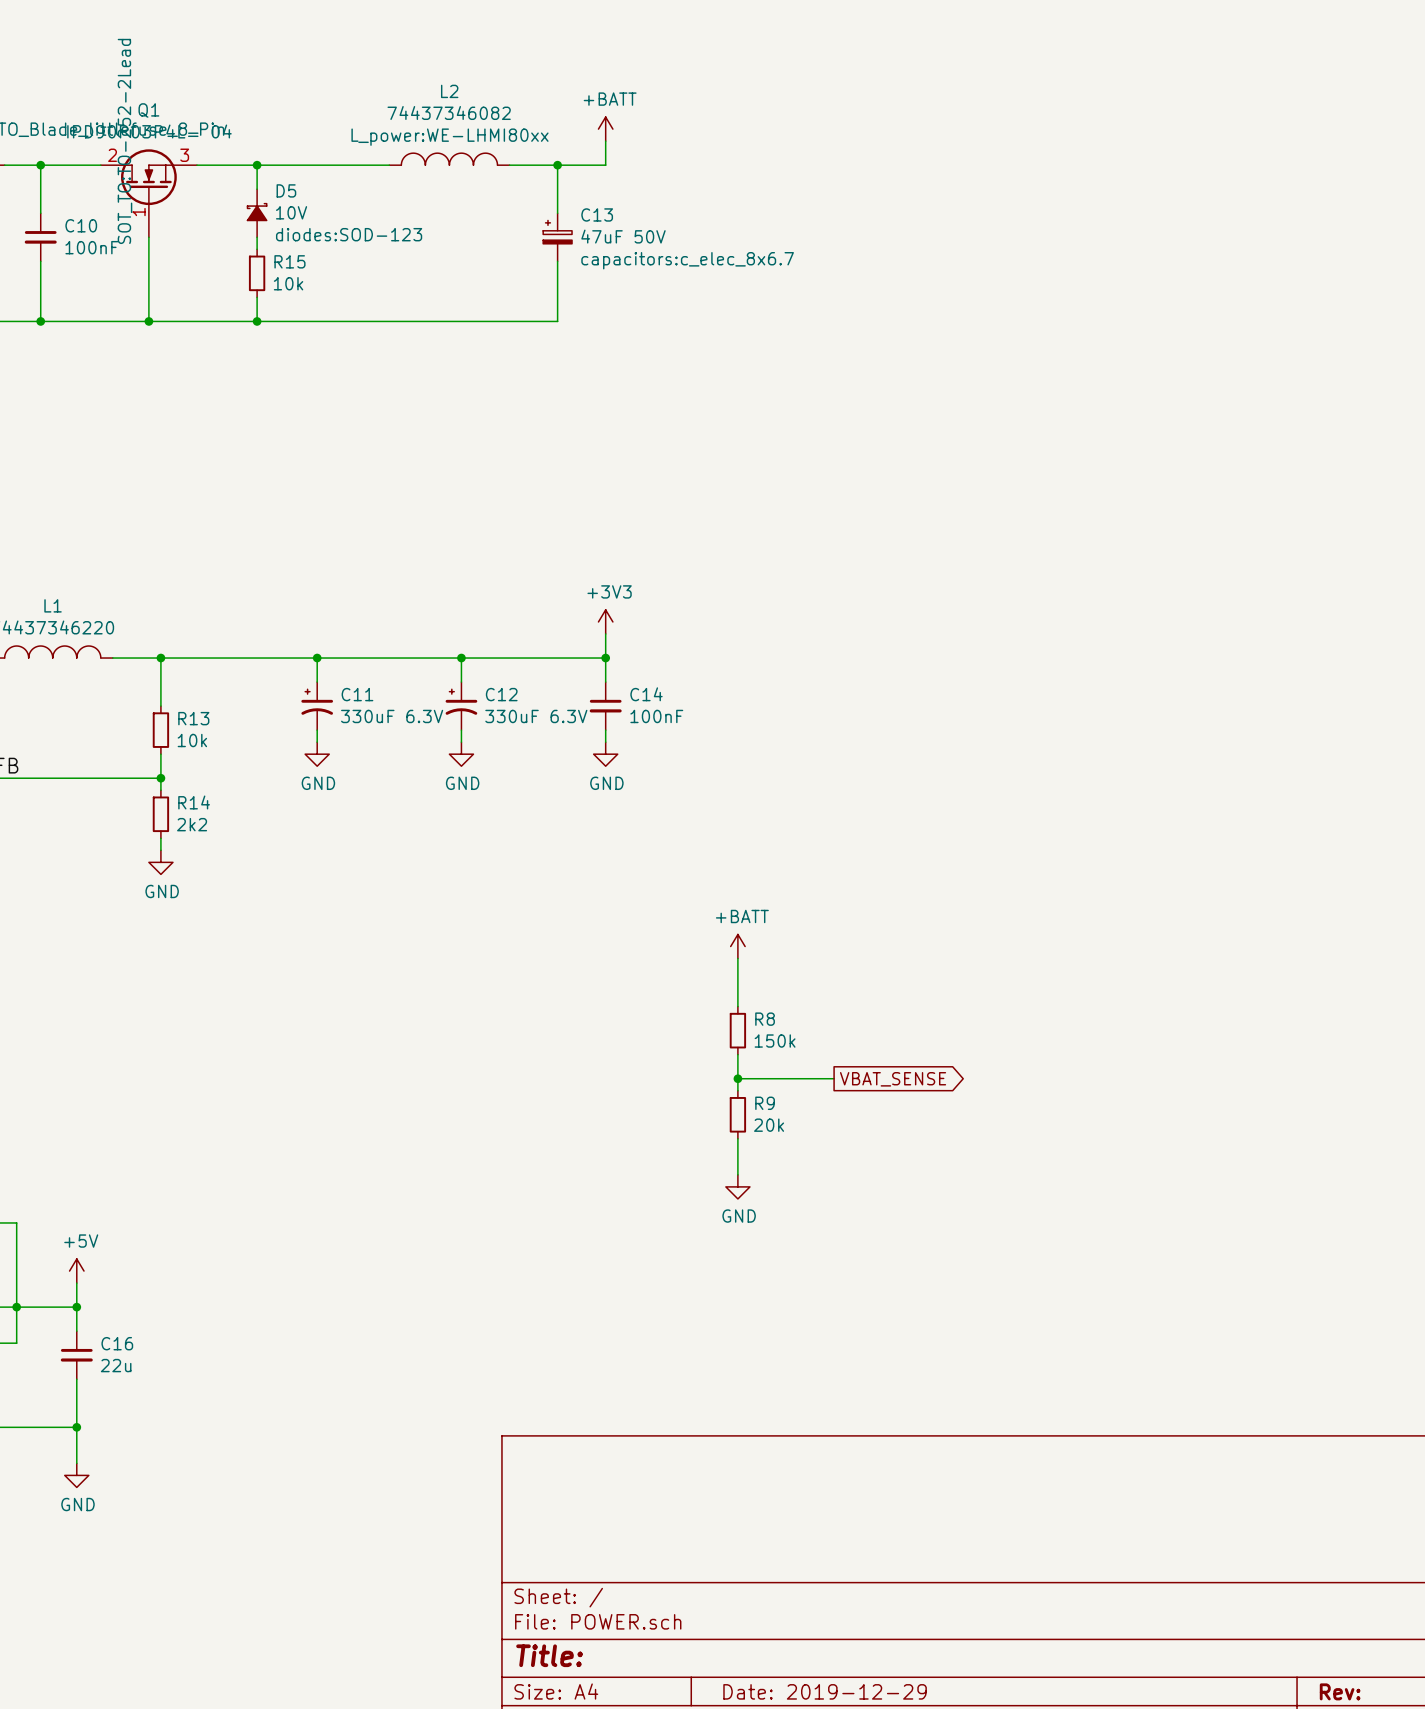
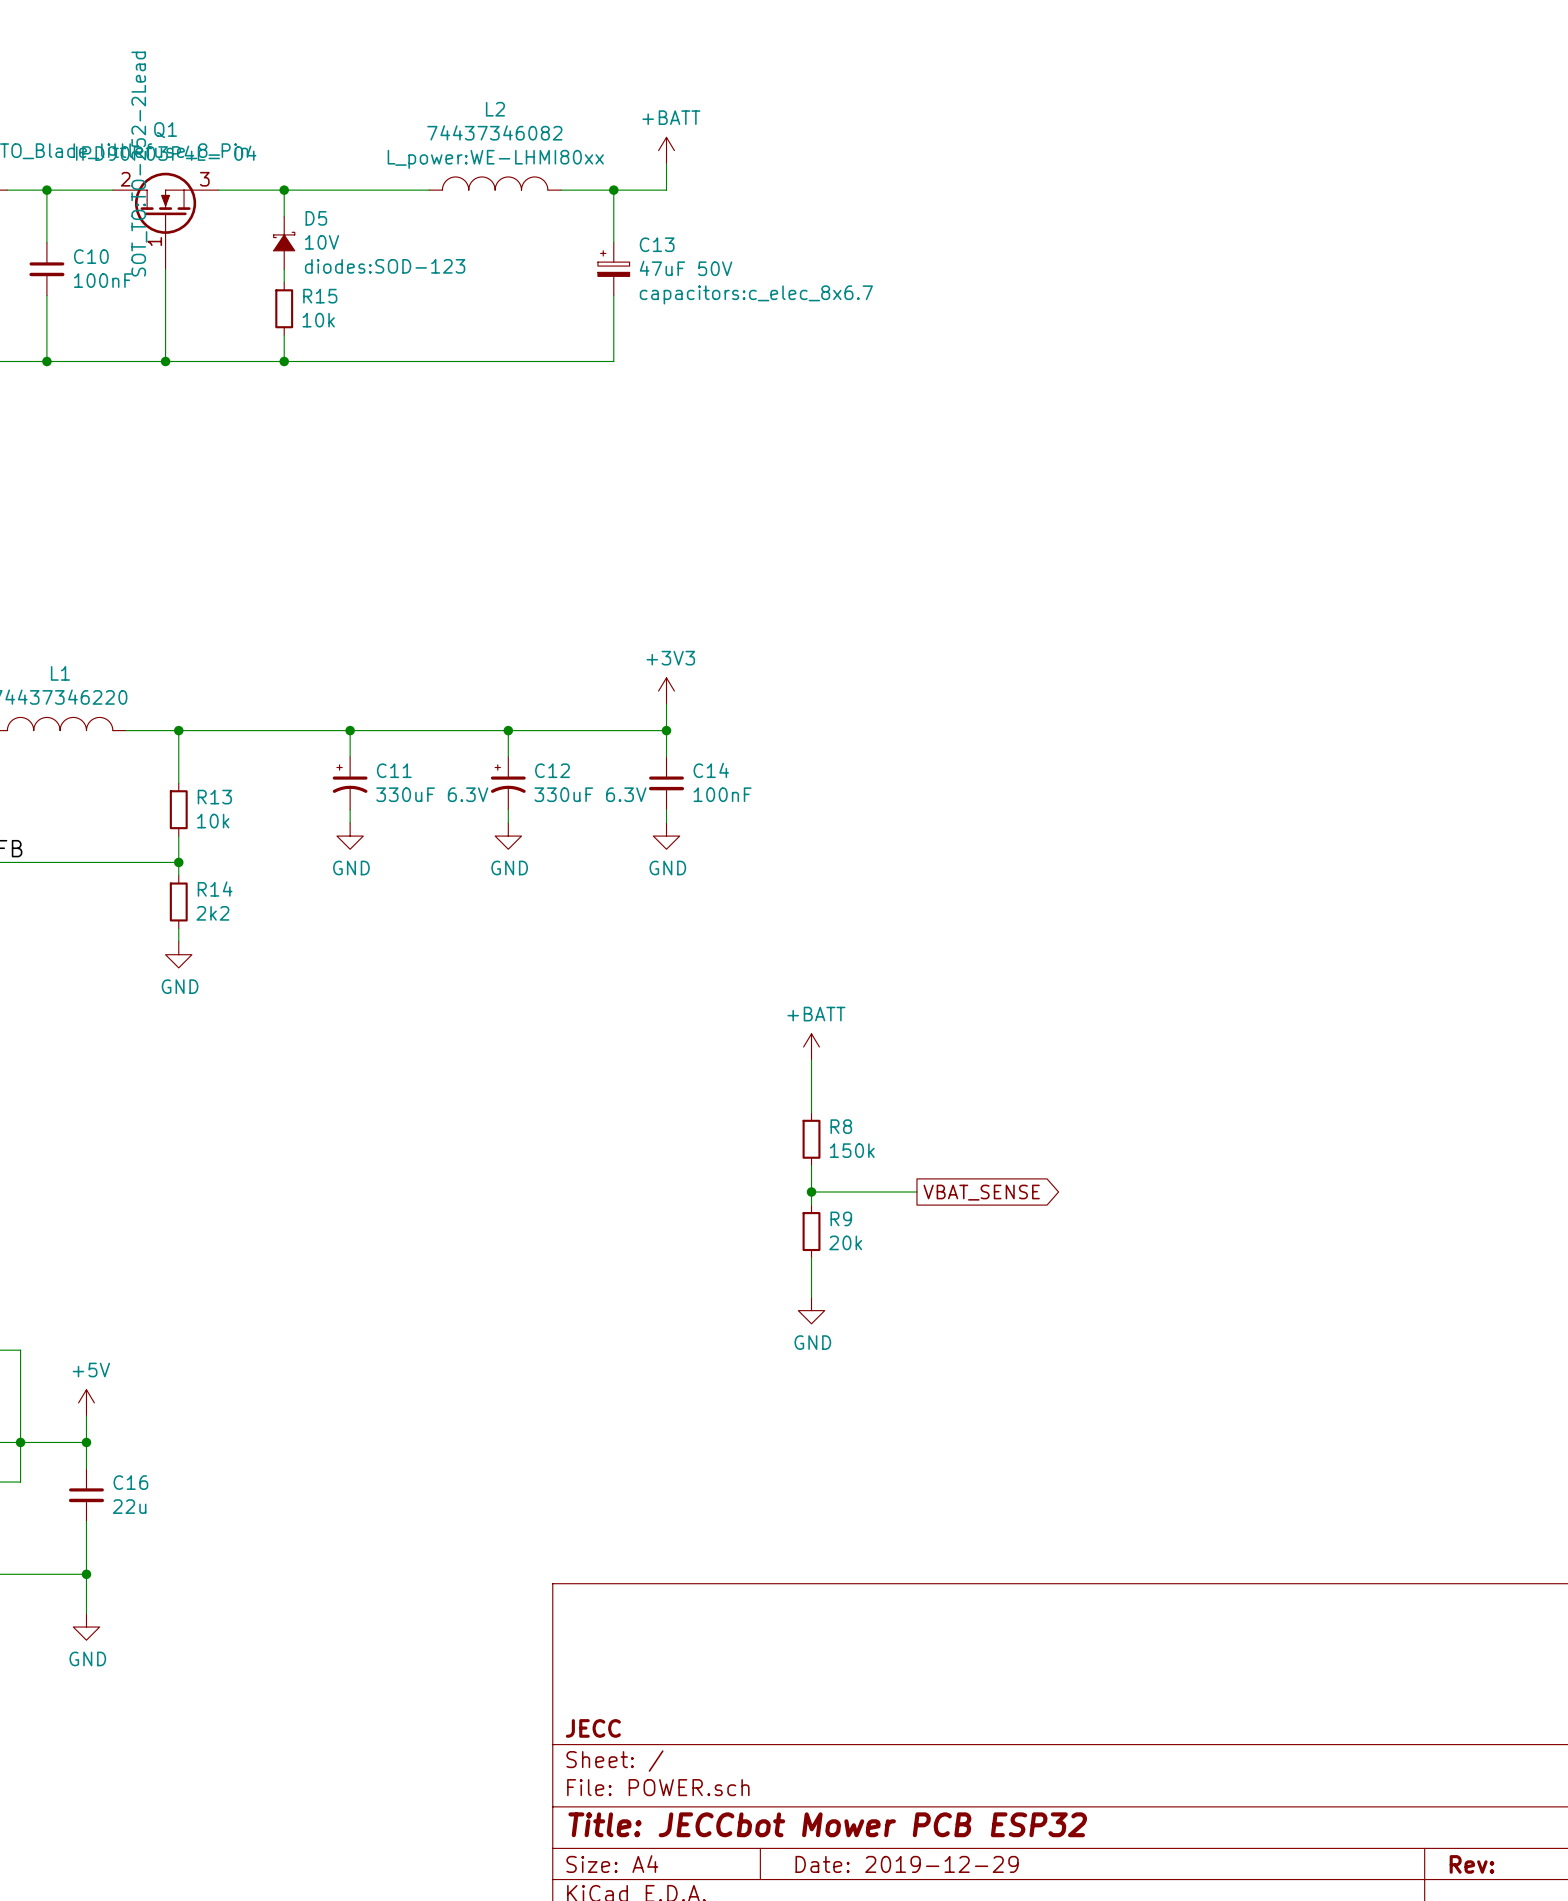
title block: none -> JECC (593, 1728)
title block: Title: (549, 1655) -> Title: JECCbot Mower PCB ESP32 (827, 1824)

